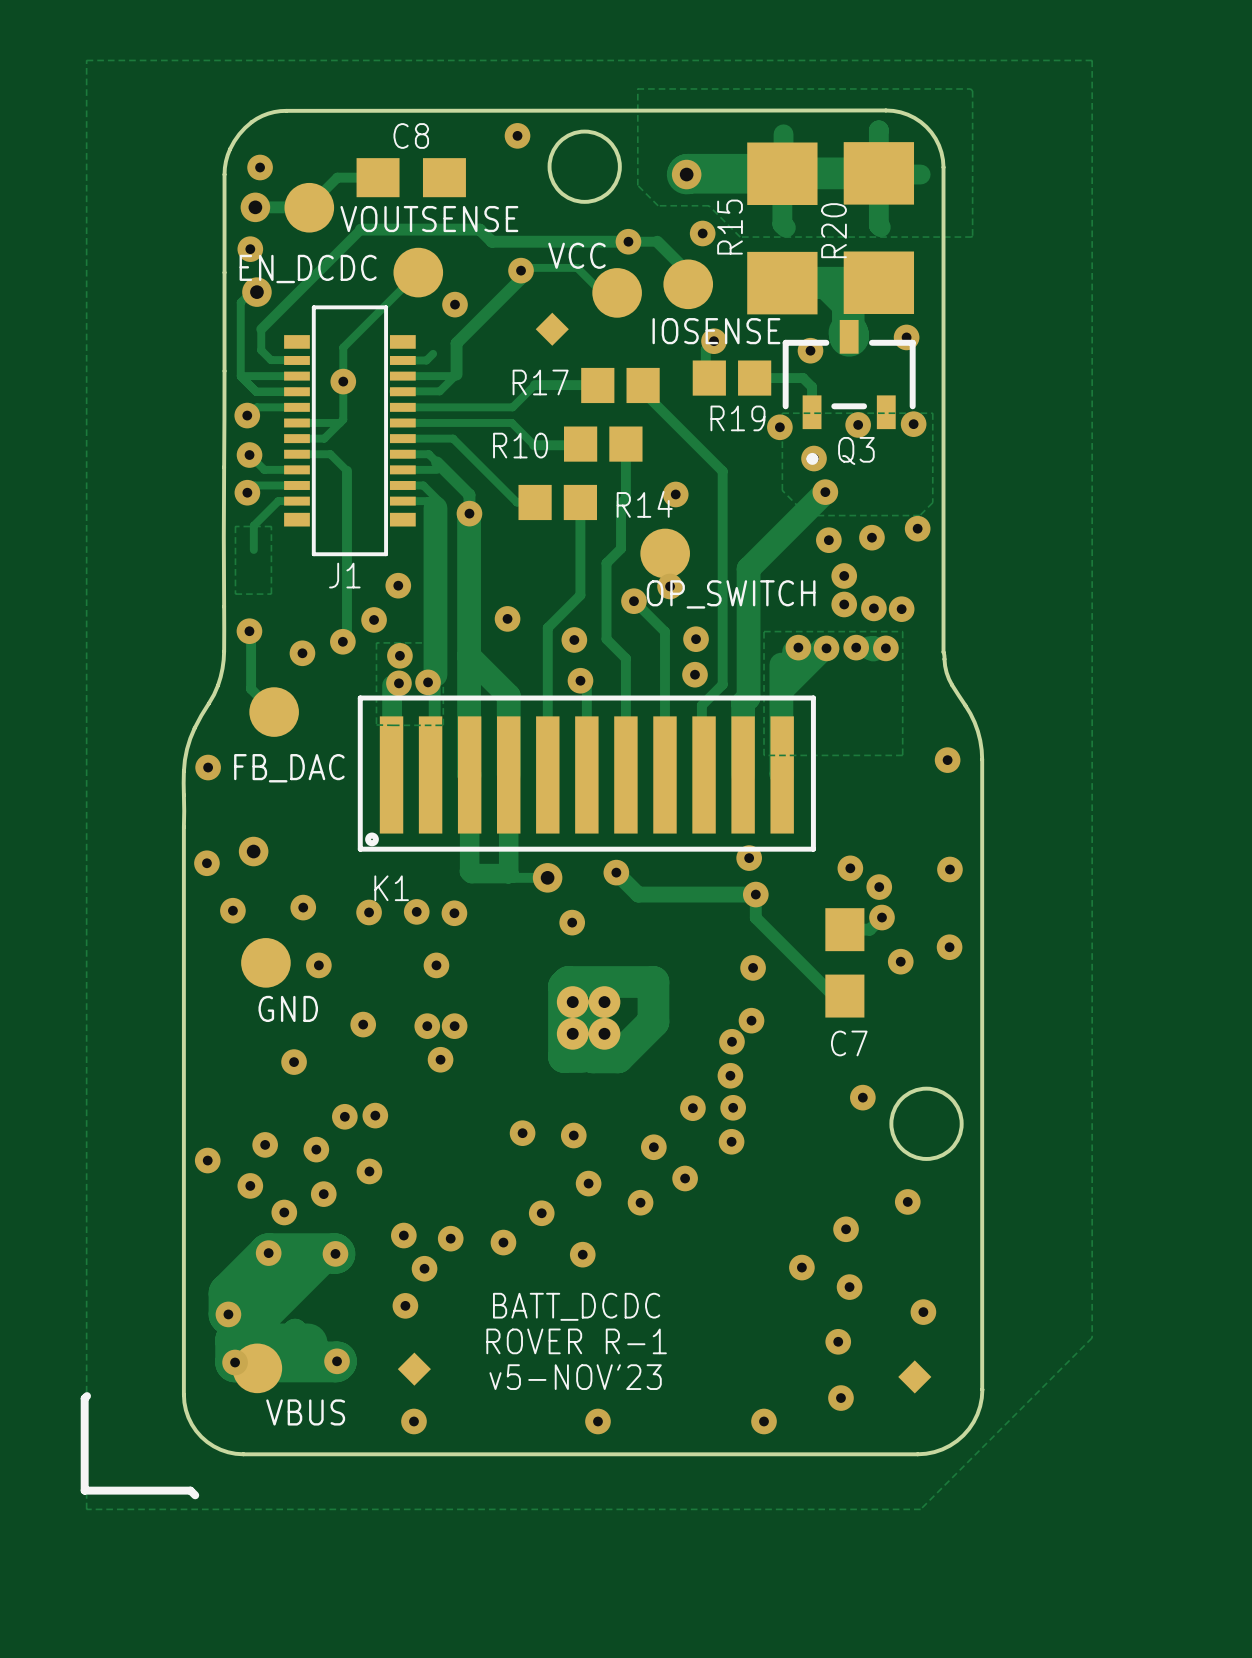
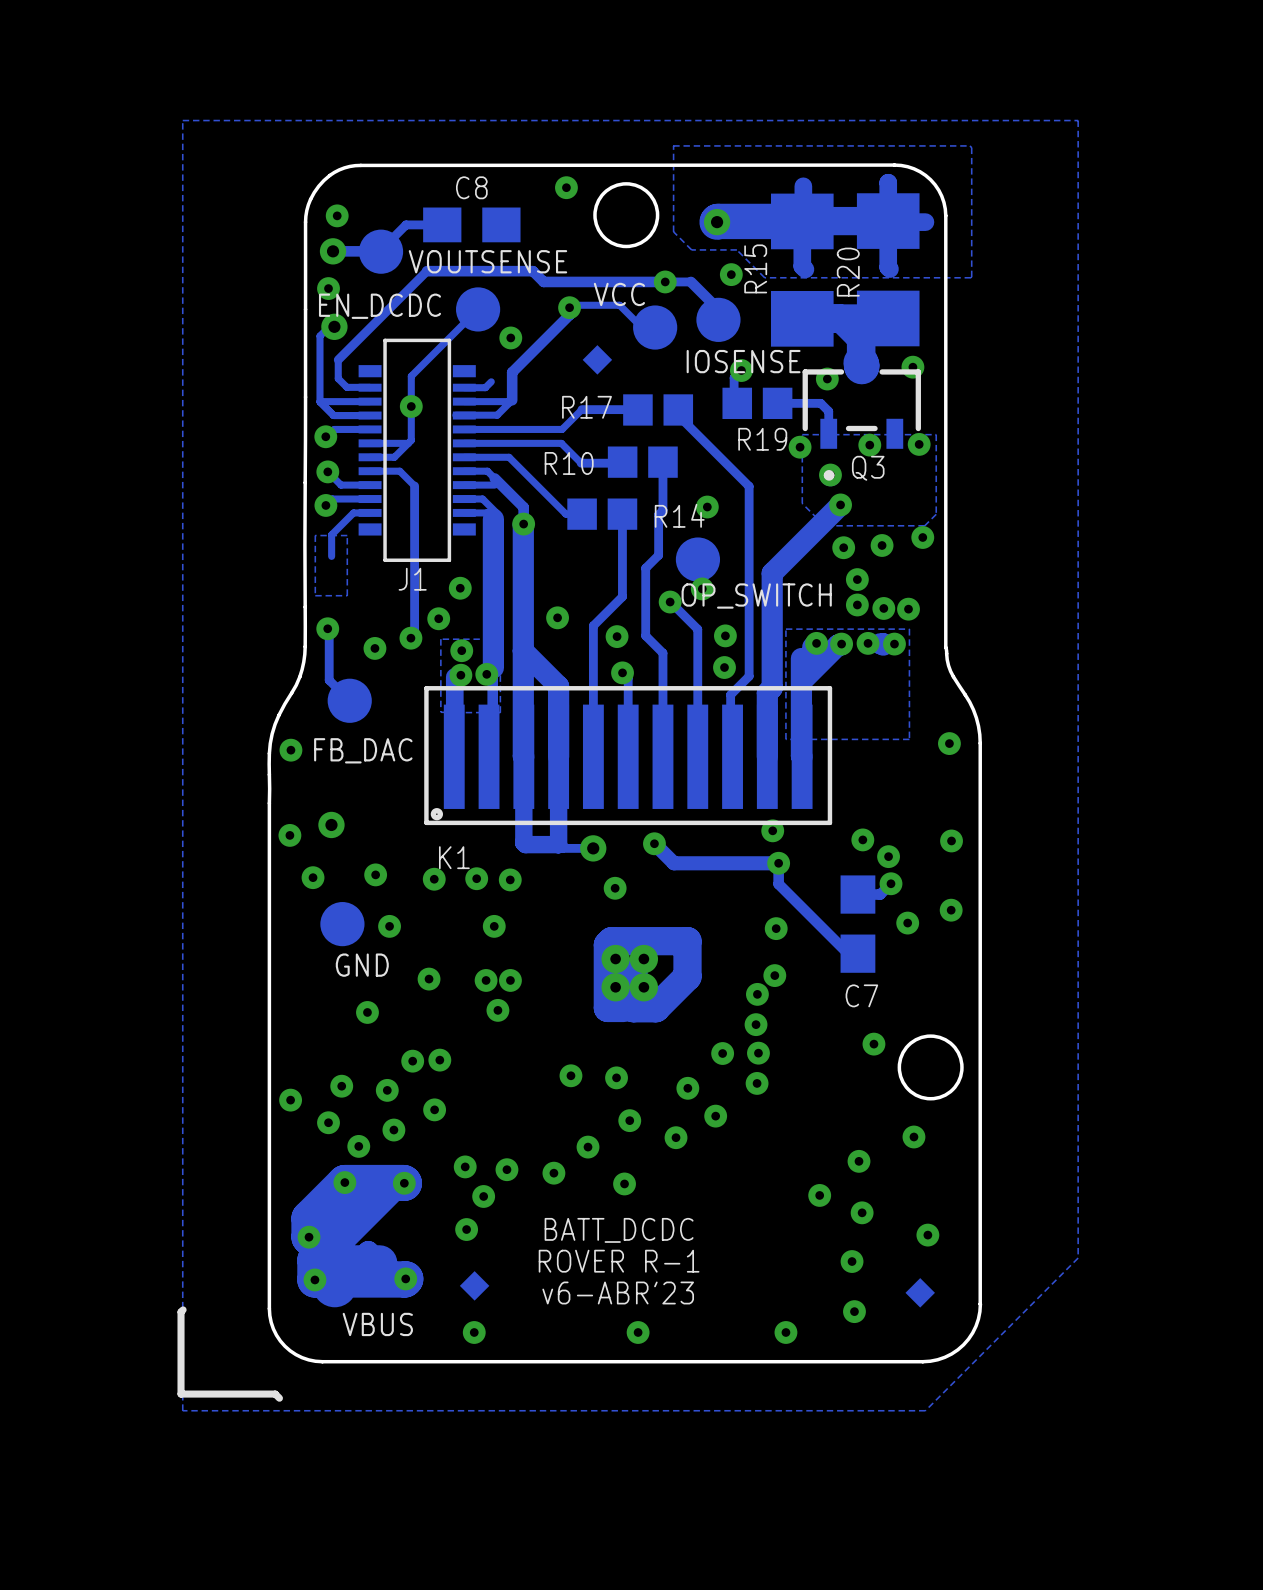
text: v5-NOV'23 (575, 1377) -> v6-ABR'23 (618, 1292)

